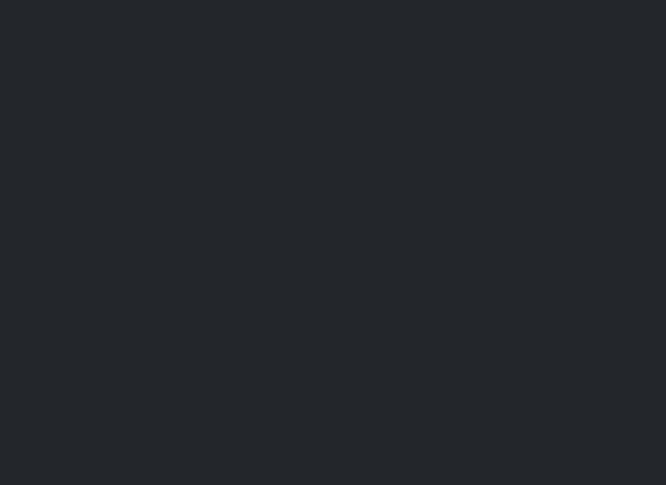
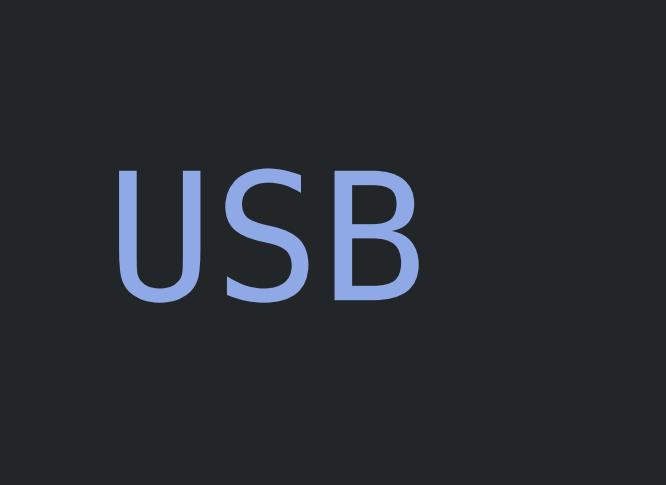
text: none -> USB (268, 235)

